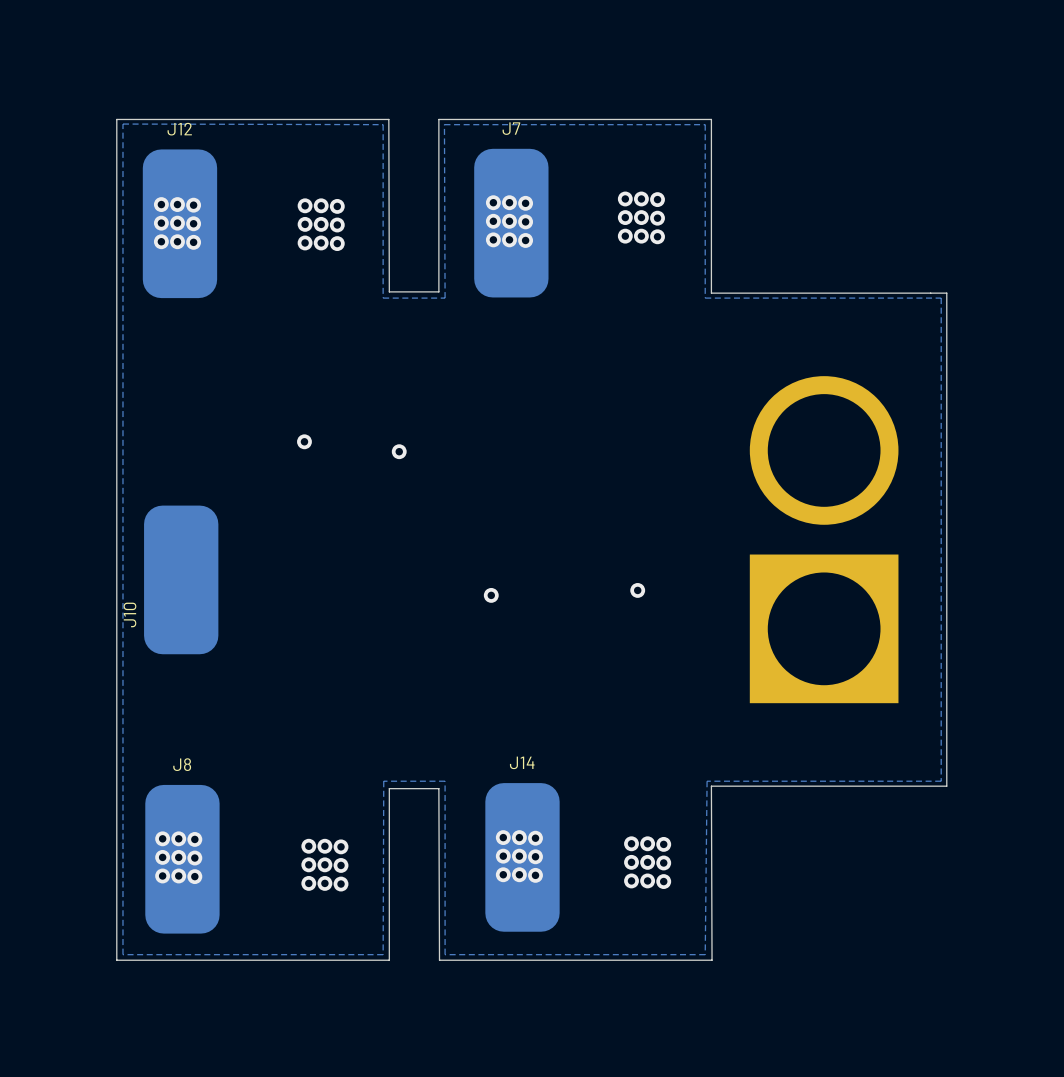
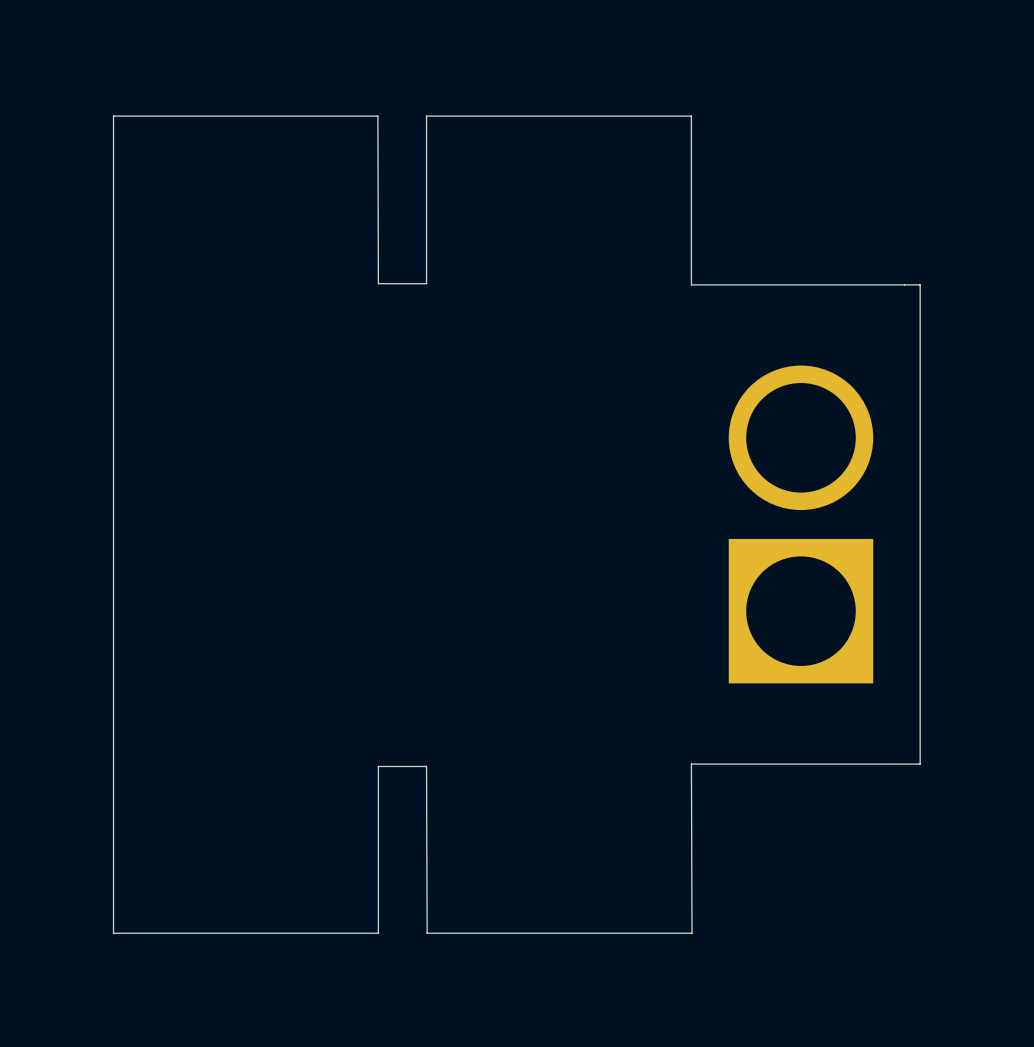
zone outline: (122, 124) (122, 954) (383, 954) (383, 781) (445, 781) (445, 954) (705, 954) (707, 781) (941, 781) (941, 298) (705, 298) (705, 124) (444, 124) (445, 298) (383, 298) (383, 124) (122, 124) -> none
via: (625, 198) -> none
via: (641, 198) -> none
via: (657, 199) -> none
via: (493, 202) -> none
via: (509, 202) -> none
via: (525, 203) -> none
via: (161, 204) -> none
via: (177, 204) -> none
via: (193, 205) -> none
via: (305, 205) -> none
via: (321, 205) -> none
via: (337, 206) -> none
via: (625, 217) -> none
via: (641, 217) -> none
via: (657, 218) -> none
via: (493, 221) -> none
via: (509, 221) -> none
via: (525, 221) -> none
via: (161, 223) -> none
via: (177, 223) -> none
J12: (179, 223) -> none
via: (193, 223) -> none
J7: (511, 223) -> none
via: (305, 224) -> none
via: (321, 224) -> none
via: (337, 225) -> none
via: (625, 236) -> none
via: (641, 236) -> none
via: (657, 236) -> none
via: (493, 239) -> none
via: (509, 239) -> none
via: (525, 240) -> none
via: (161, 241) -> none
via: (177, 241) -> none
via: (193, 242) -> none
via: (305, 242) -> none
via: (321, 242) -> none
via: (337, 243) -> none
via: (304, 441) -> none
via: (399, 451) -> none
J10: (181, 579) -> none
via: (637, 590) -> none
via: (491, 595) -> none
via: (503, 837) -> none
via: (519, 837) -> none
via: (162, 838) -> none
via: (178, 838) -> none
via: (535, 838) -> none
via: (194, 839) -> none
via: (631, 843) -> none
via: (647, 843) -> none
via: (663, 844) -> none
via: (308, 846) -> none
via: (324, 846) -> none
via: (341, 846) -> none
via: (503, 856) -> none
via: (519, 856) -> none
via: (535, 856) -> none
via: (162, 857) -> none
via: (178, 857) -> none
J14: (522, 857) -> none
via: (194, 858) -> none
J8: (182, 859) -> none
via: (631, 862) -> none
via: (647, 862) -> none
via: (663, 862) -> none
via: (308, 864) -> none
via: (324, 864) -> none
via: (341, 865) -> none
via: (503, 874) -> none
via: (519, 874) -> none
via: (162, 875) -> none
via: (178, 875) -> none
via: (535, 875) -> none
via: (194, 876) -> none
via: (631, 880) -> none
via: (647, 880) -> none
via: (663, 881) -> none
via: (308, 883) -> none
via: (324, 883) -> none
via: (341, 884) -> none

